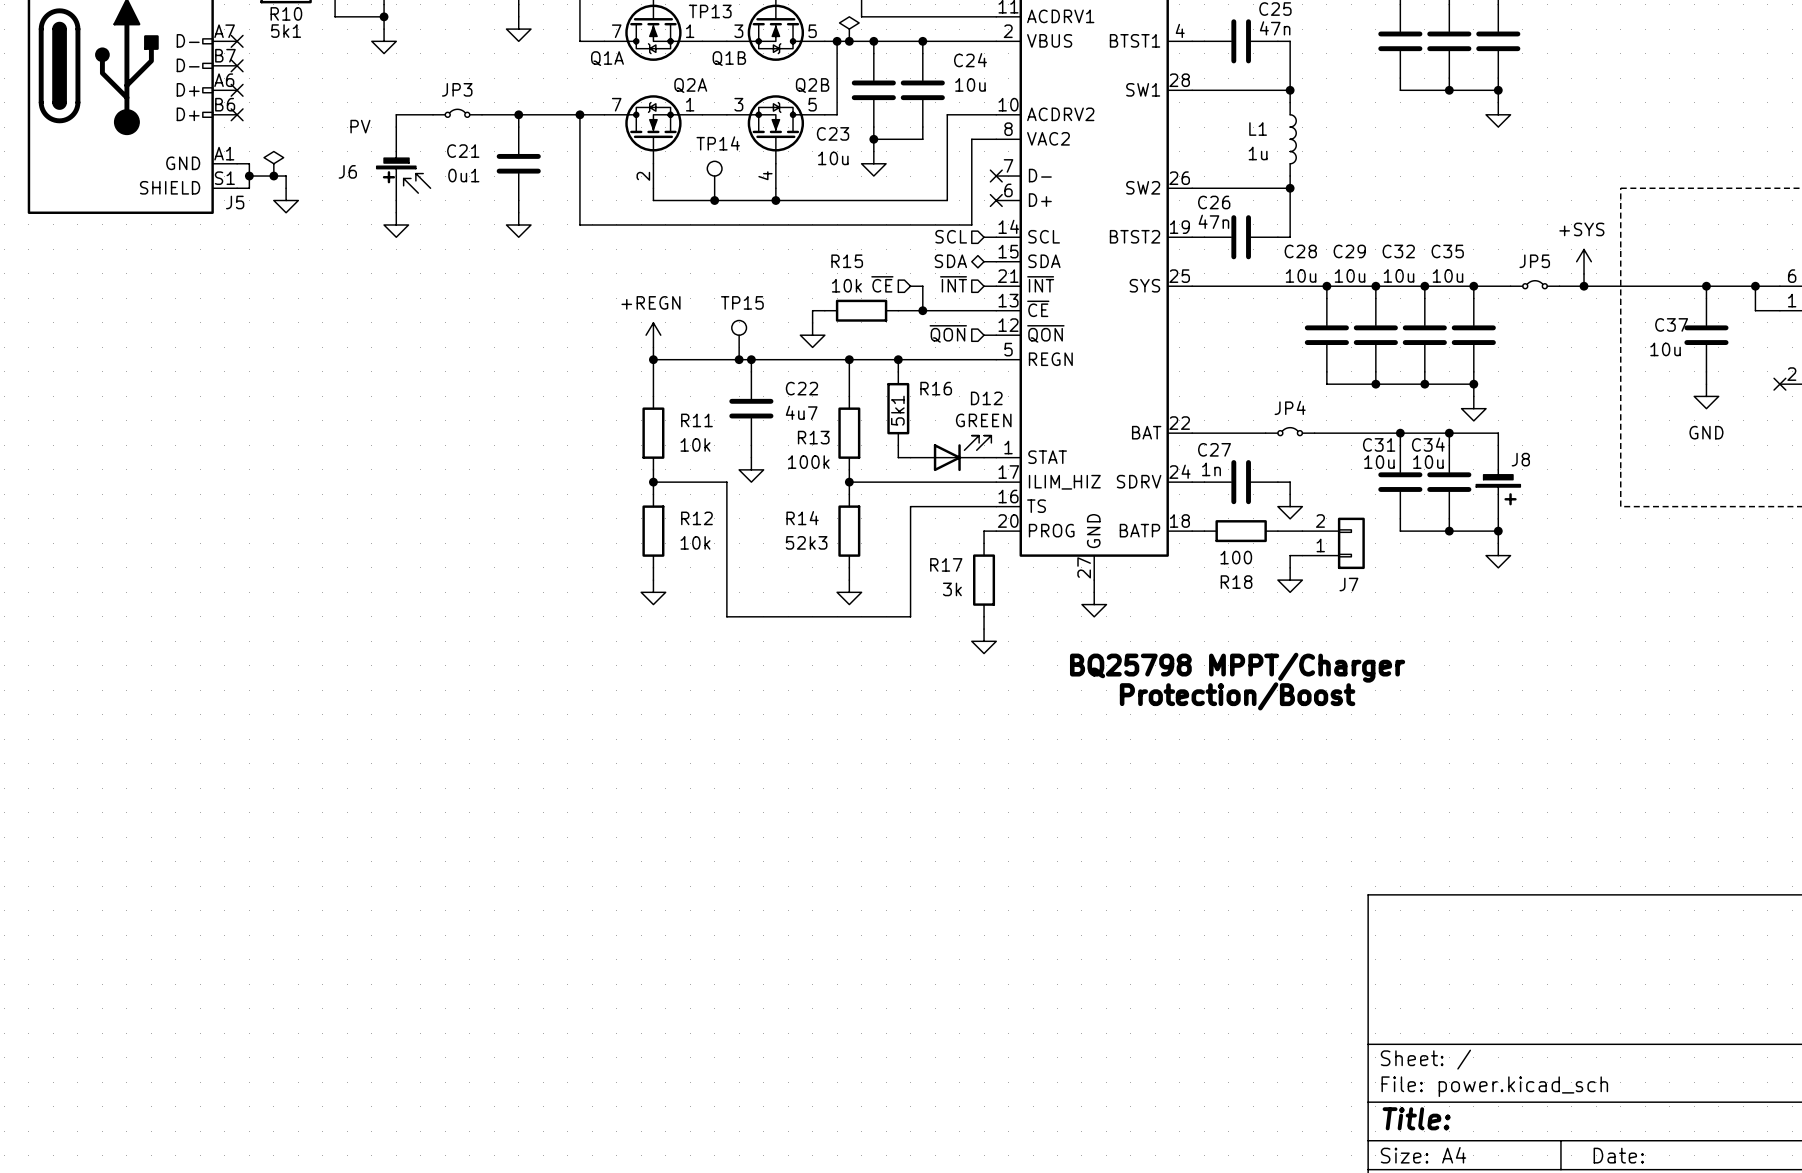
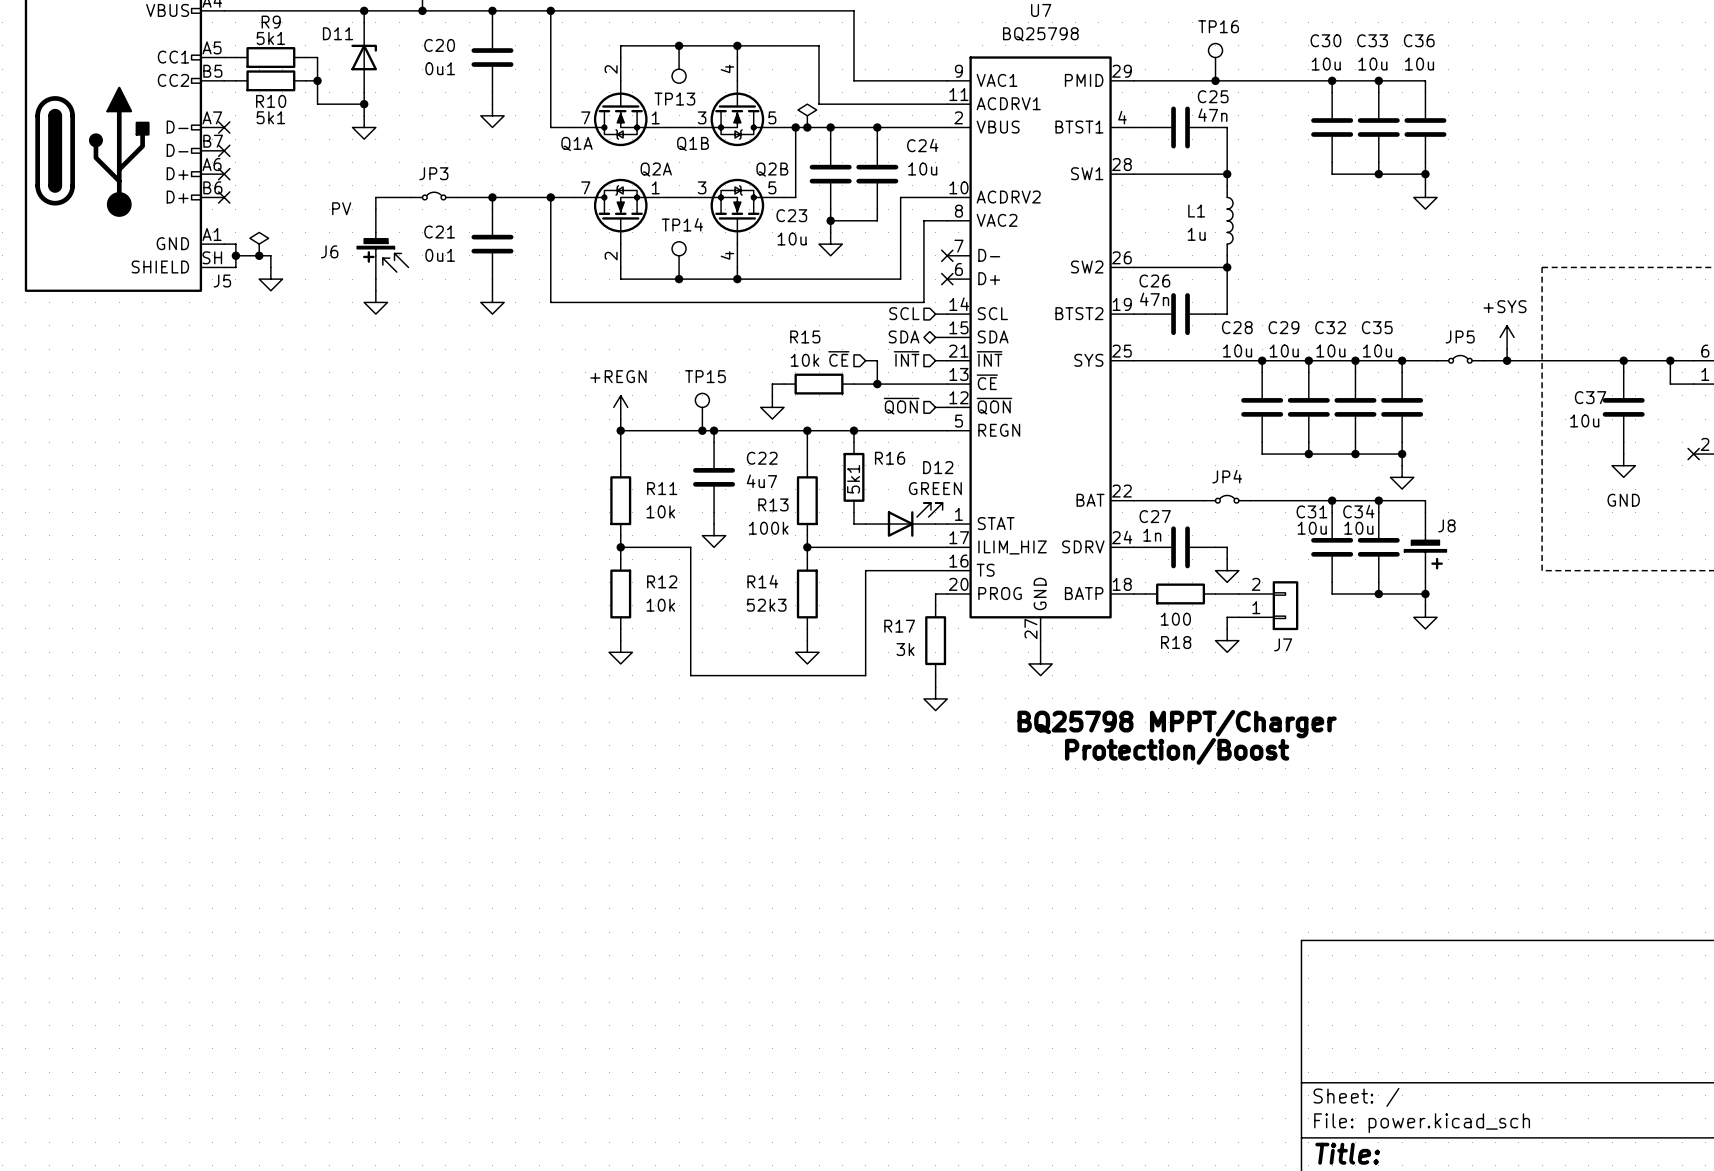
J5 pin number: S1 (224, 178) -> SH (212, 257)

